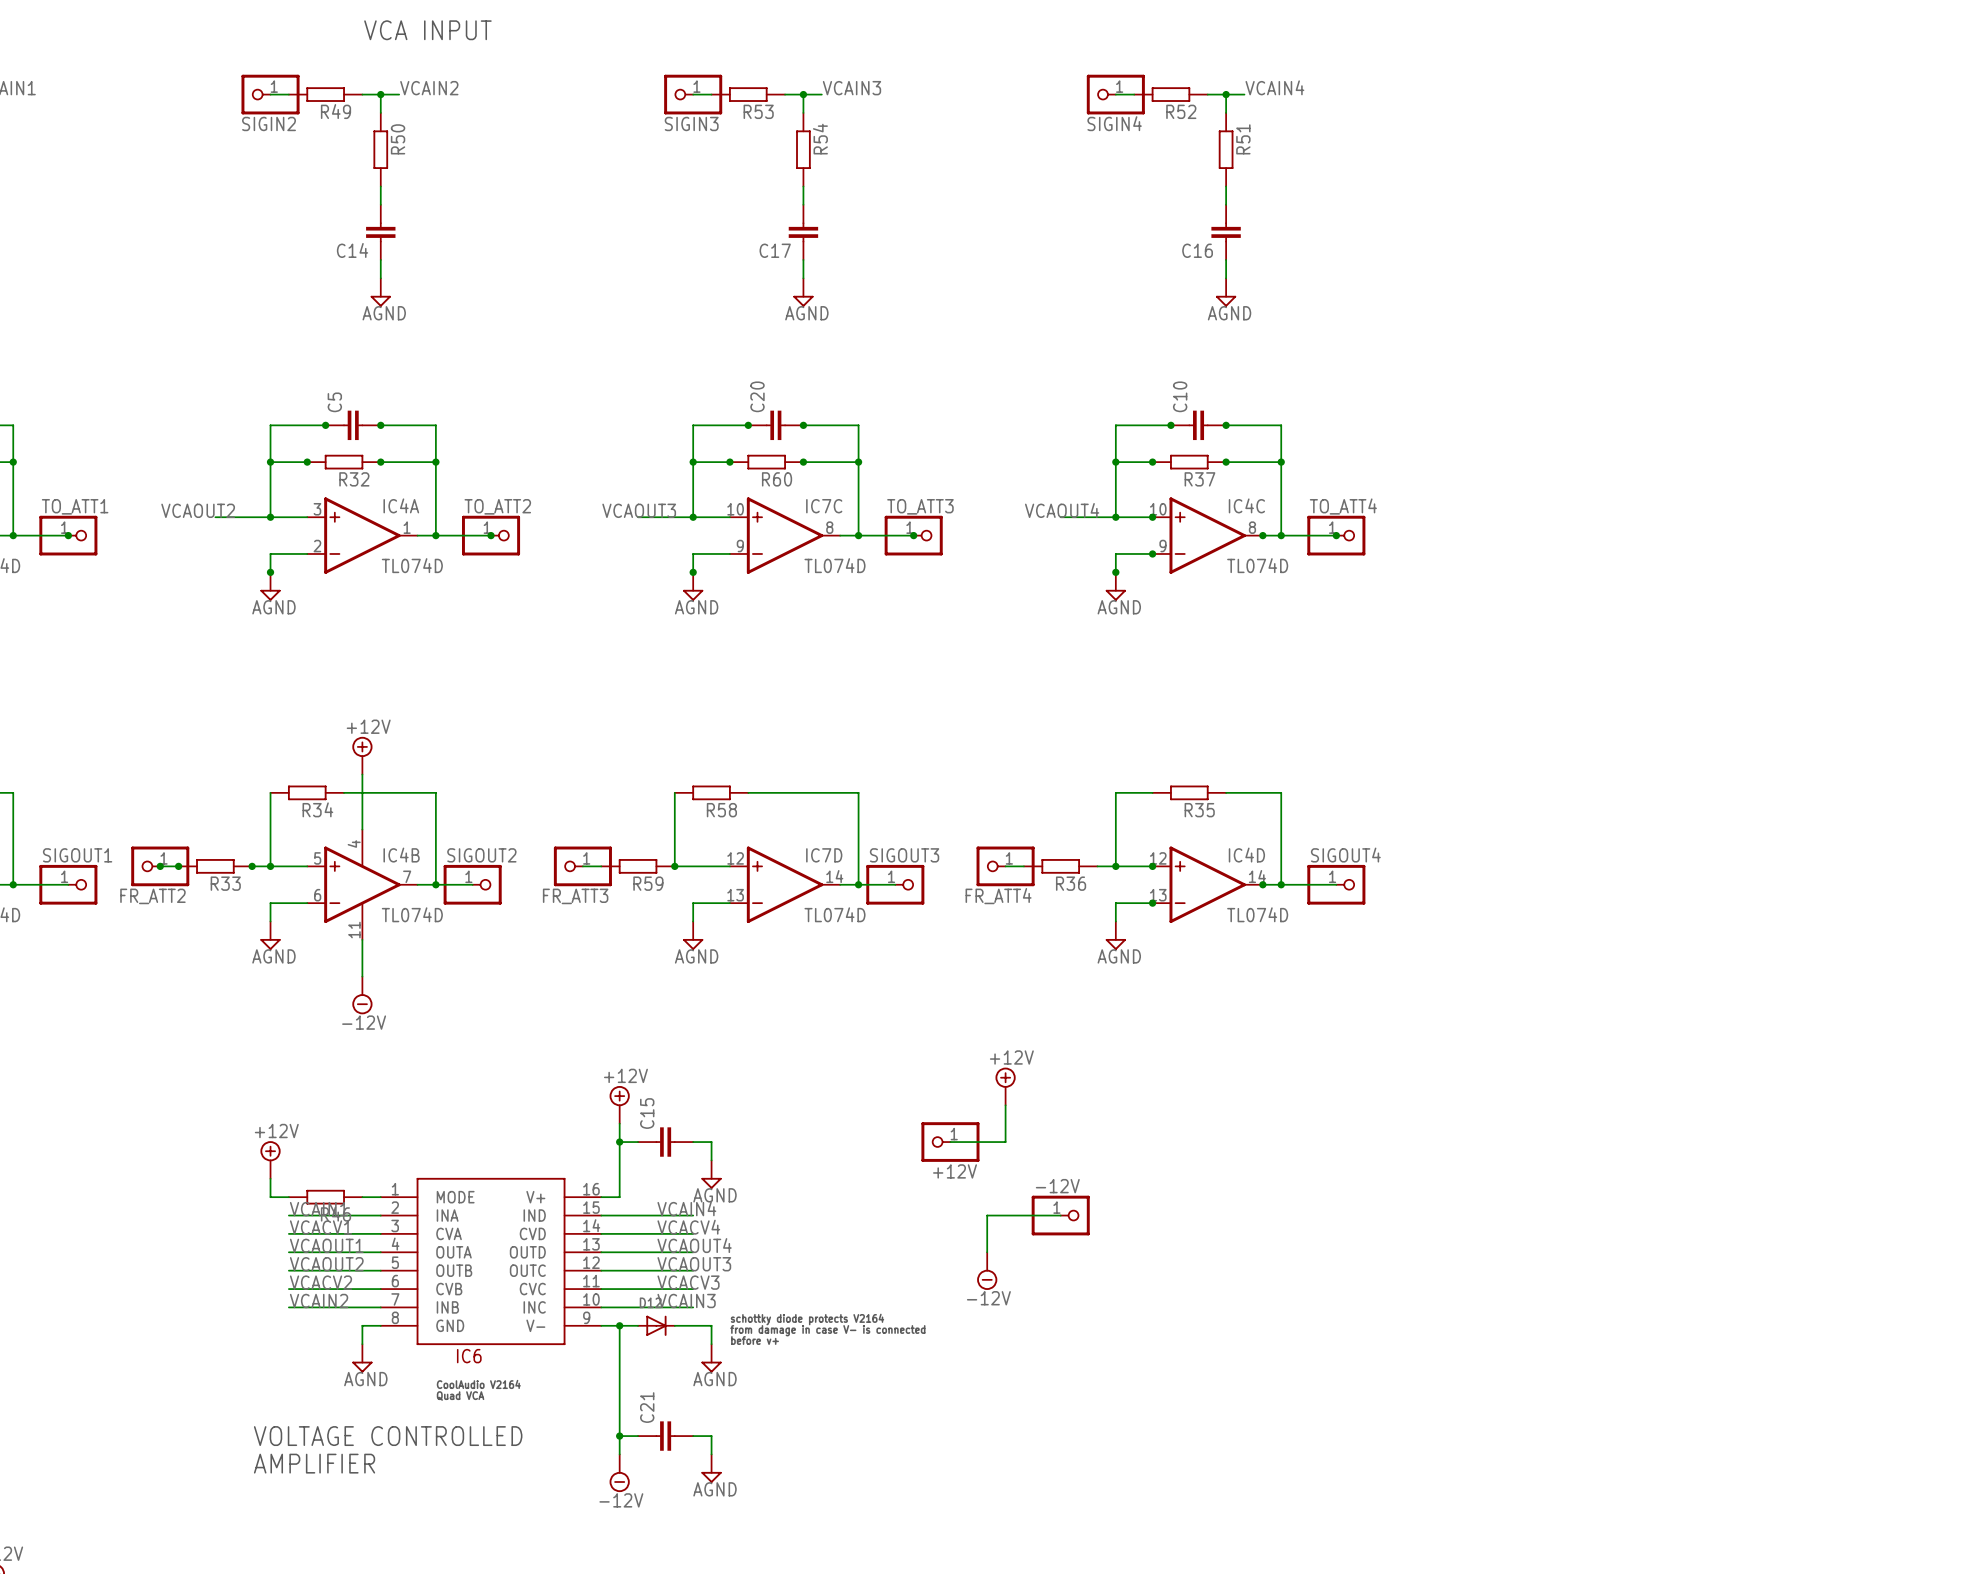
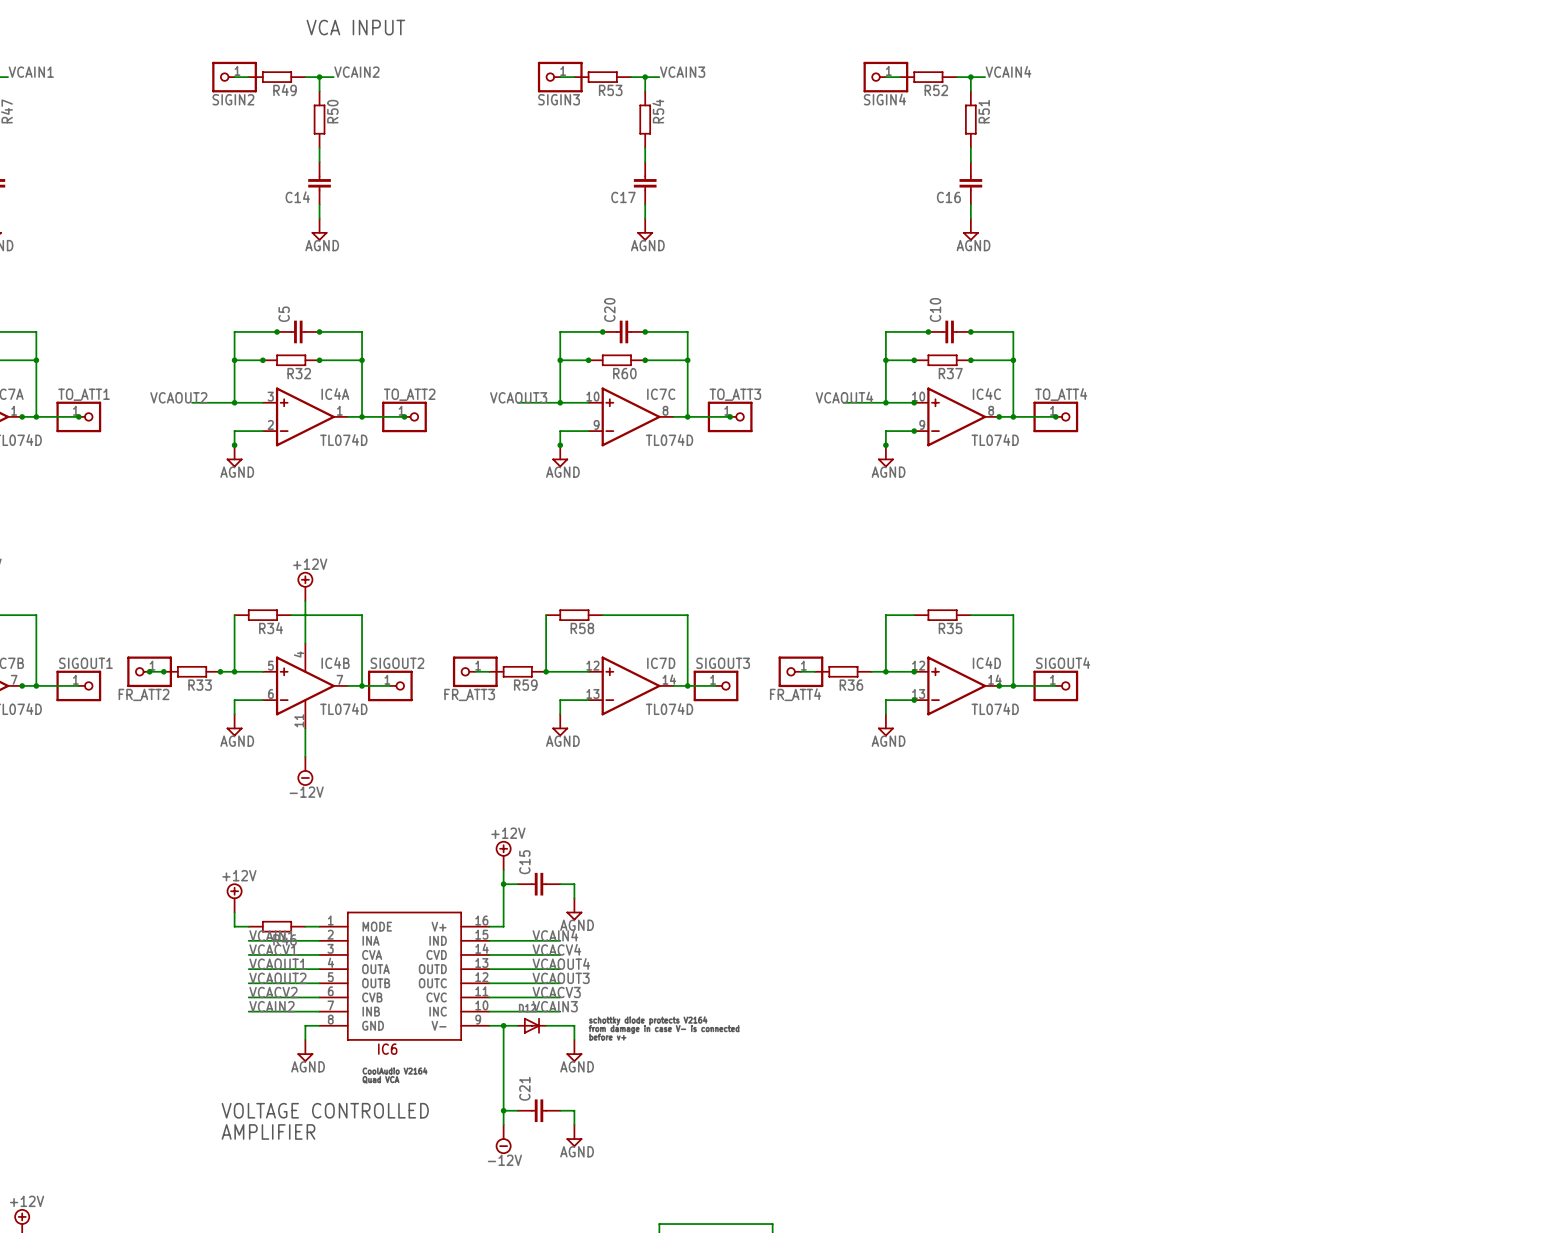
power symbol: +12V (1005, 1086) -> none
wire: (1005, 1105) (1005, 1142) (950, 1142) -> none
+12V: (950, 1142) -> none
wire: (1060, 1215) (987, 1215) (987, 1252) -> none
-12V: (1060, 1215) -> none
power symbol: -12V (987, 1271) -> none

